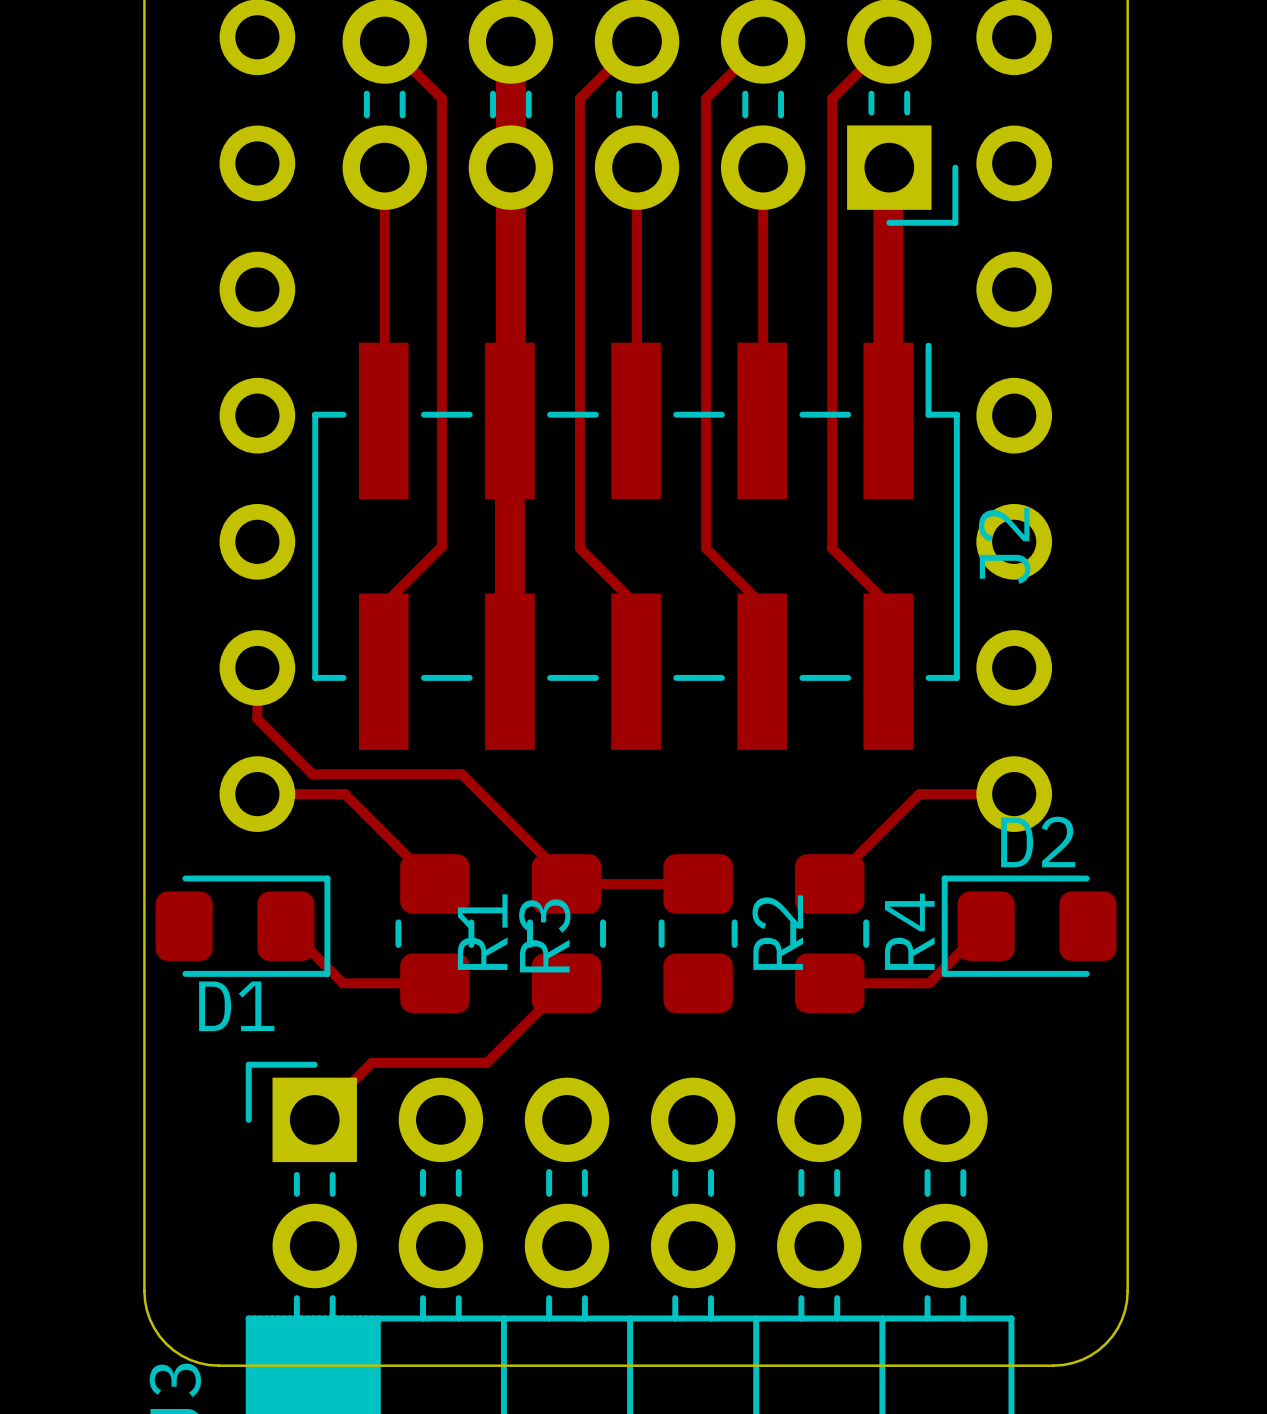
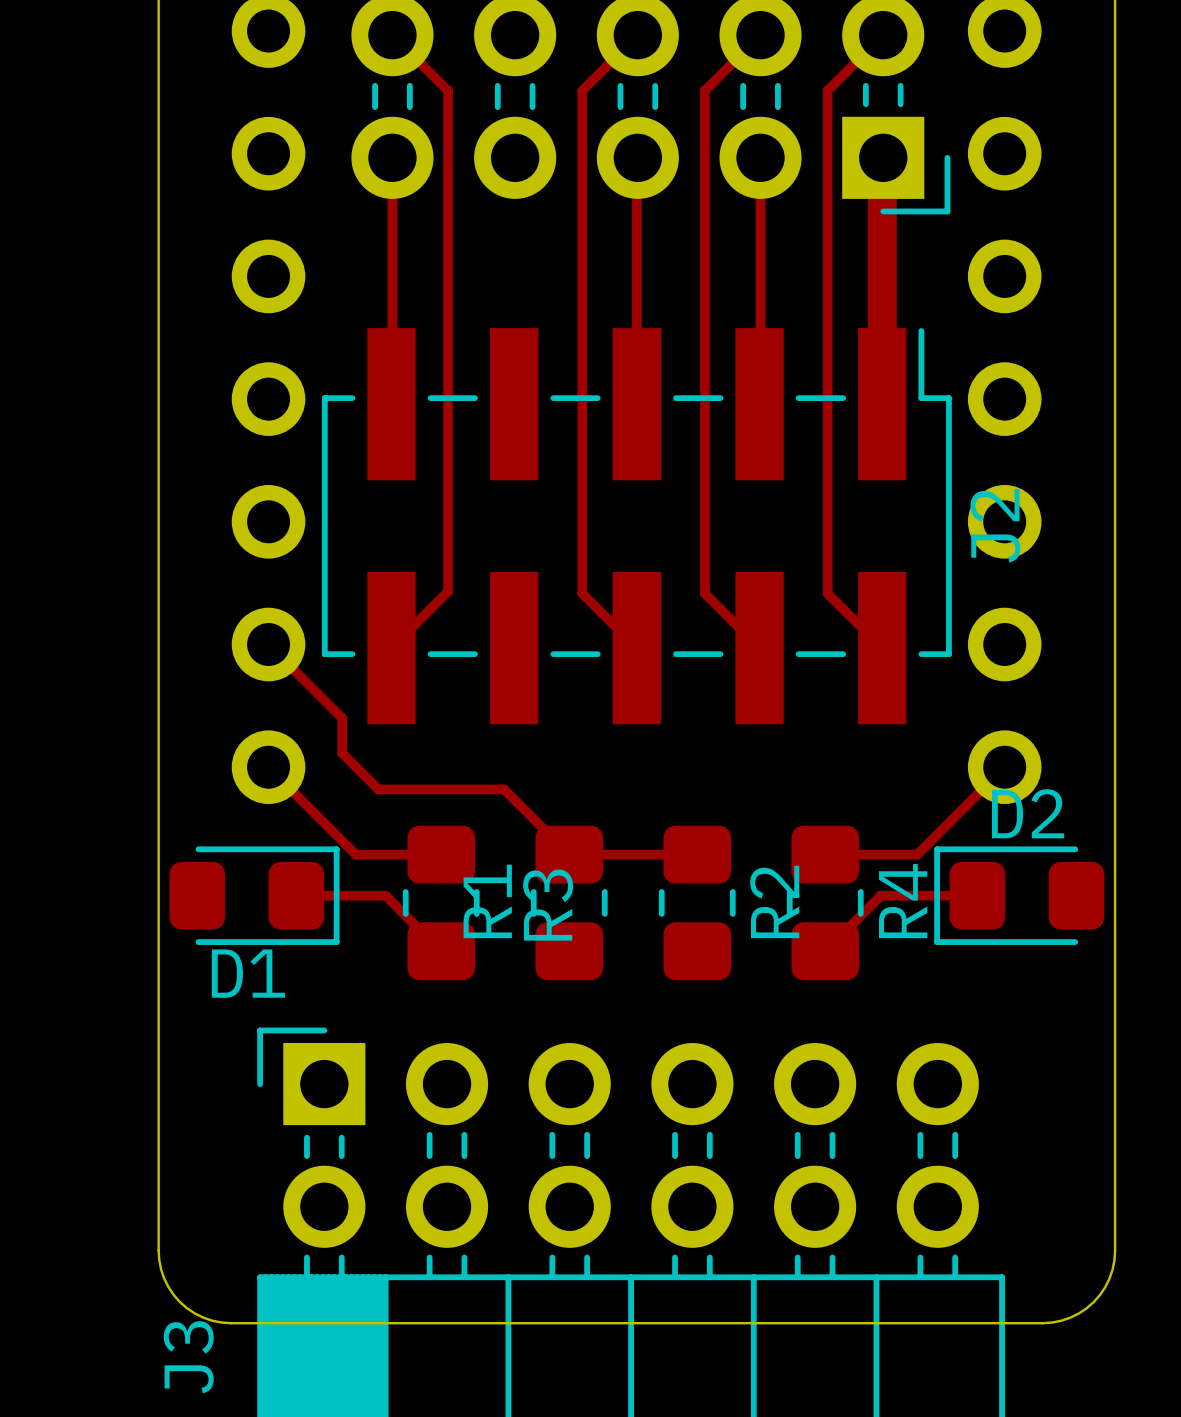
track: (510, 41) (509, 604) -> none
track: (637, 167) (636, 353) -> (637, 157) (636, 404)
track: (441, 546) (383, 604) -> (448, 526) (448, 591) (391, 648)
track: (579, 548) (636, 604) -> (582, 528) (582, 593) (636, 648)
track: (706, 548) (762, 604) -> (704, 528) (704, 593) (759, 648)
track: (832, 548) (888, 604) -> (827, 528) (827, 593) (882, 648)
track: (257, 667) (257, 718) (312, 774) (461, 774) (566, 879) (566, 883) -> (268, 644) (342, 718) (342, 753) (378, 789) (504, 789) (569, 854)
track: (257, 794) (345, 794) (434, 883) -> (268, 767) (355, 854) (441, 854)
track: (1014, 794) (919, 794) (829, 883) -> (1004, 767) (917, 854) (825, 854)
track: (285, 926) (343, 983) (434, 983) -> (296, 895) (385, 895) (441, 951)
track: (986, 926) (929, 983) (829, 983) -> (977, 895) (880, 895) (825, 951)
track: (566, 983) (487, 1062) (371, 1062) (314, 1119) -> none

